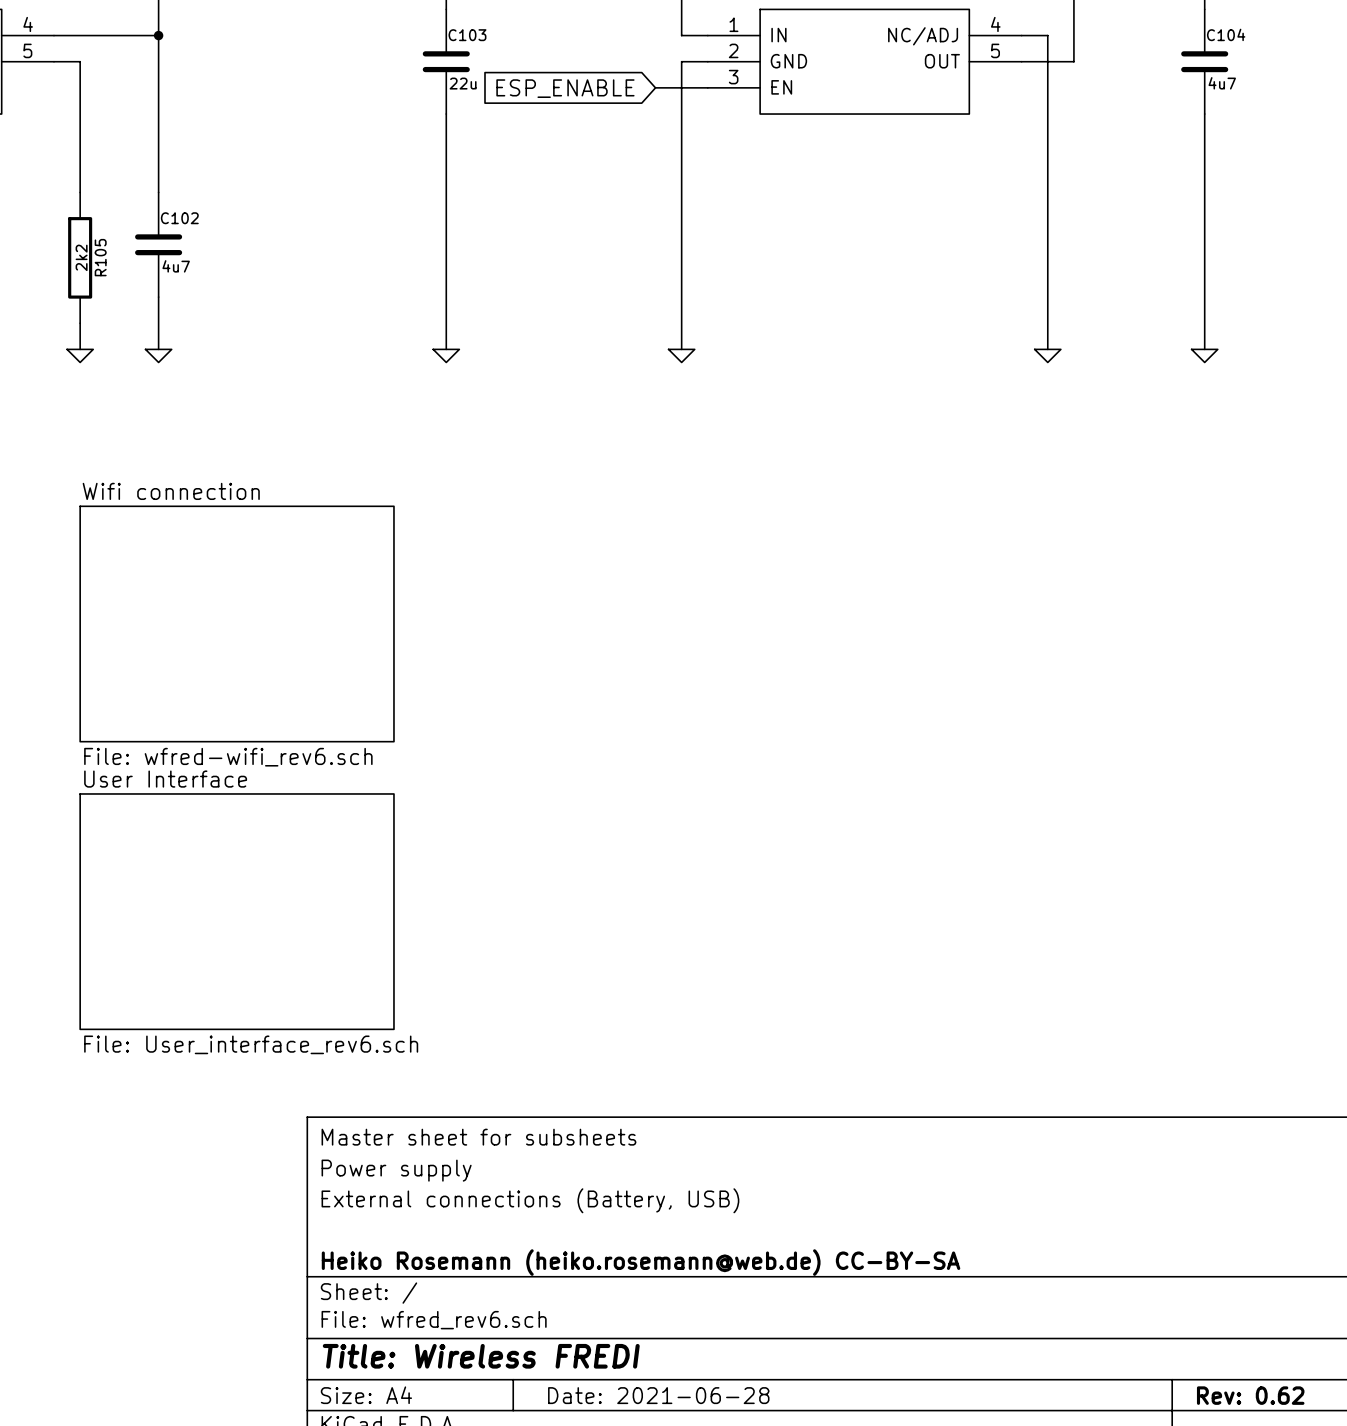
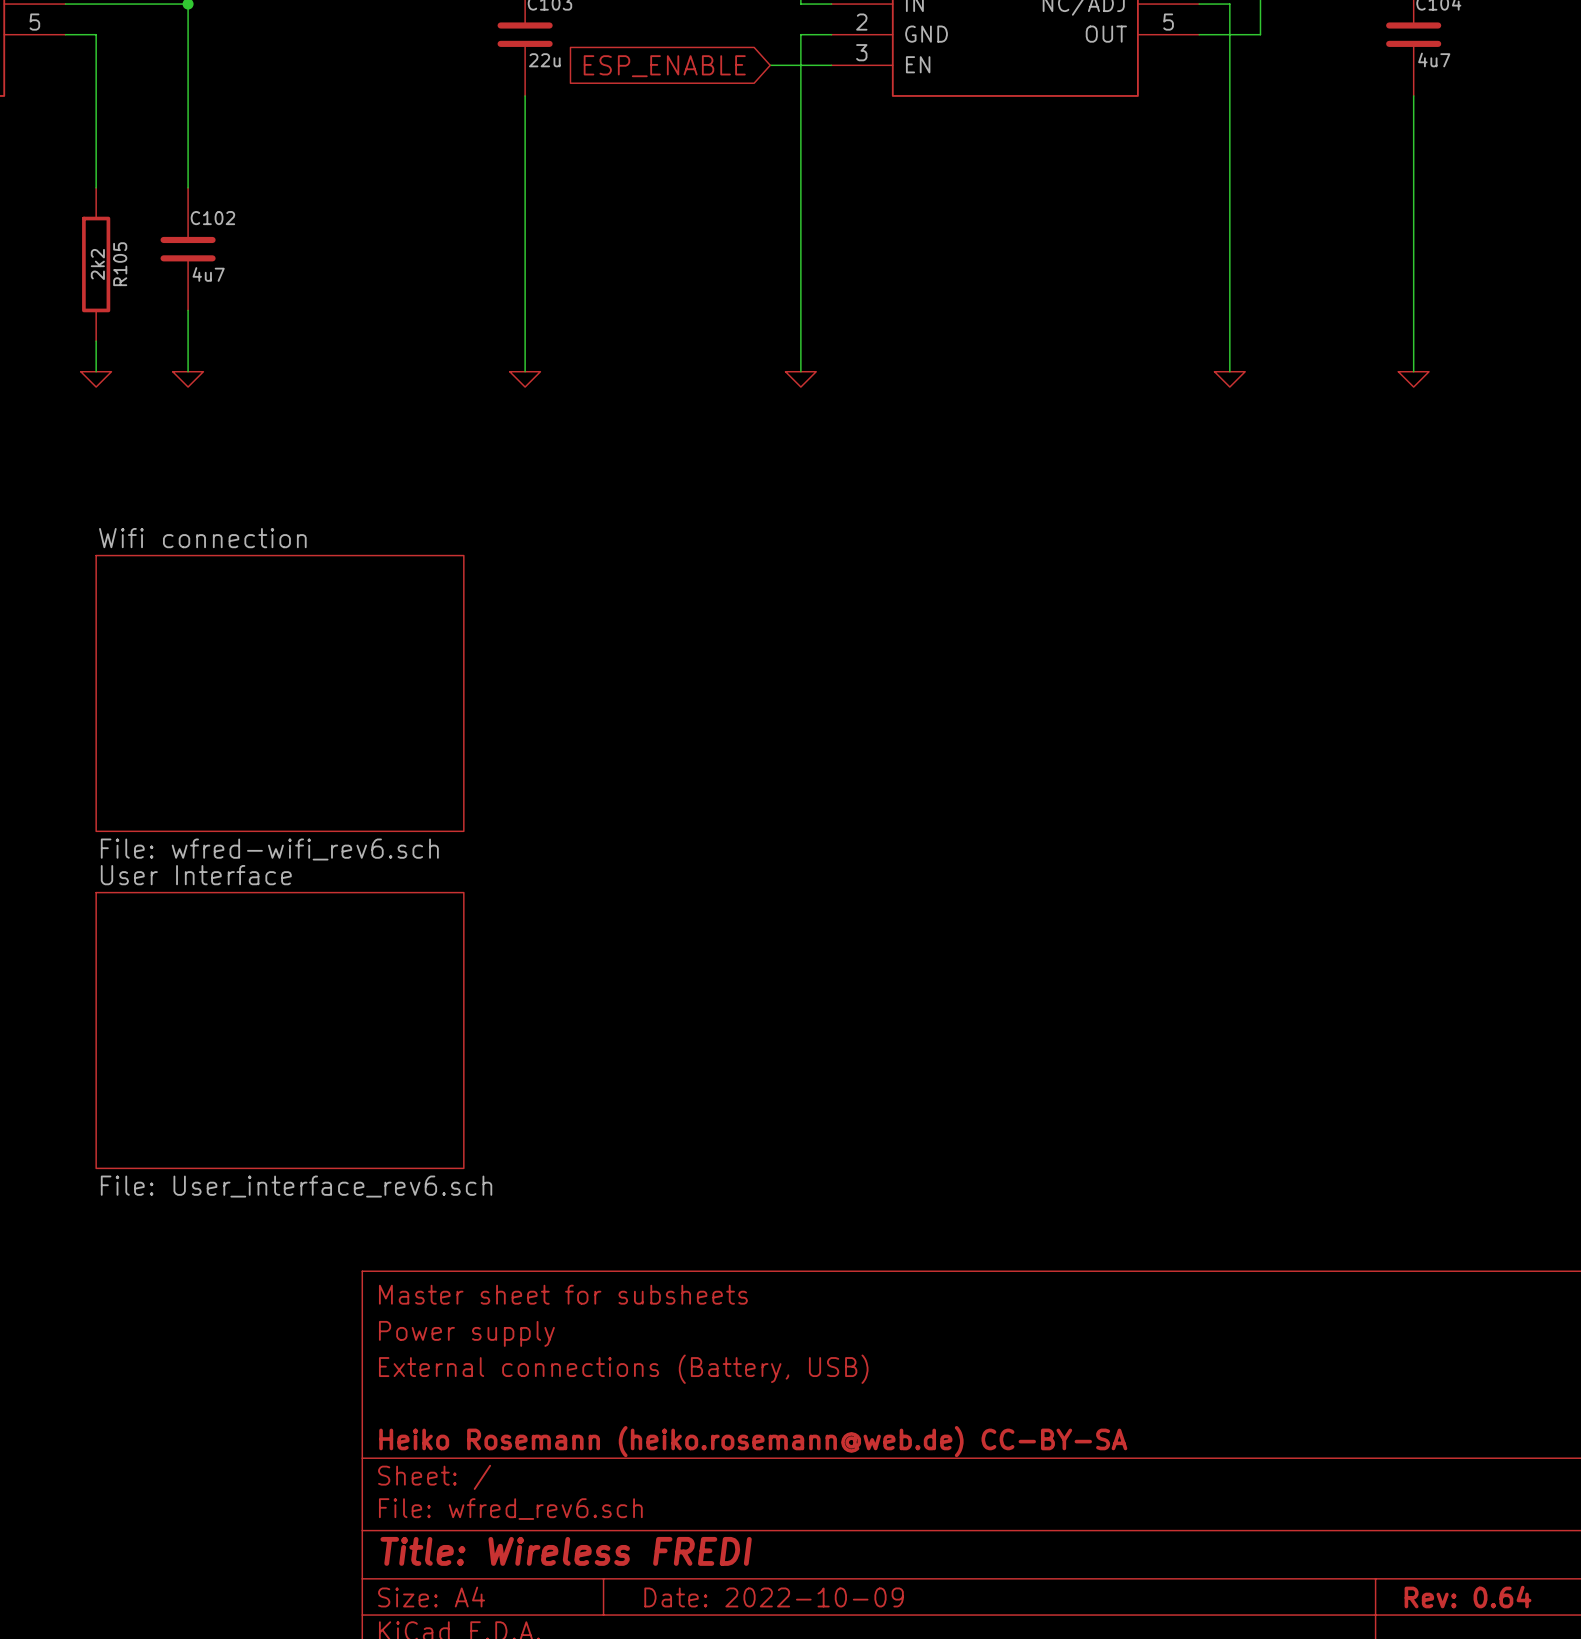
title block: Date: 2021-06-28 (658, 1395) -> Date: 2022-10-09 (774, 1597)
title block: Rev: 0.62 (1250, 1395) -> Rev: 0.64 (1468, 1597)

